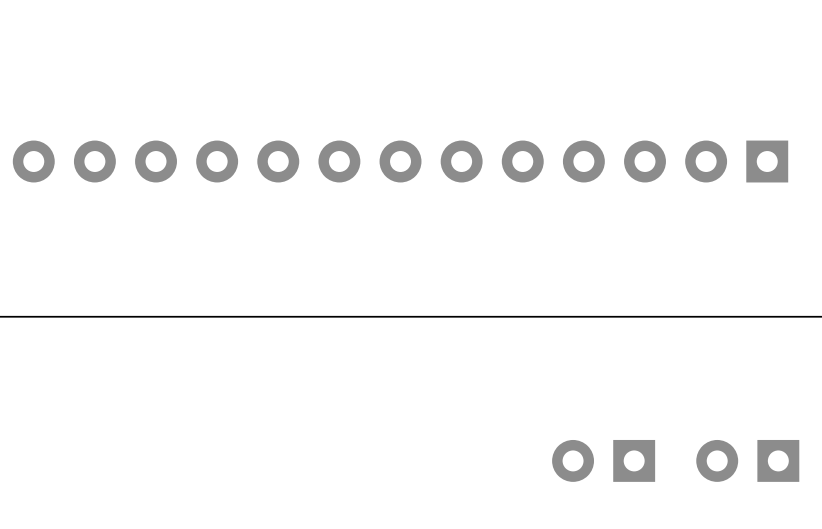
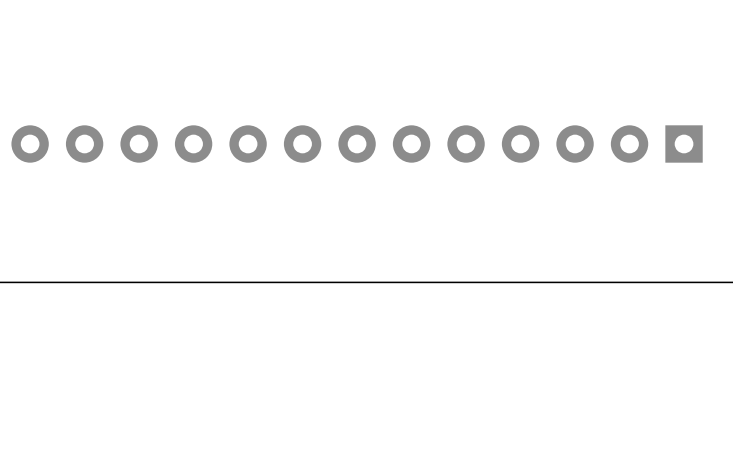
part: (603, 460) -> none
part: (747, 460) -> none

